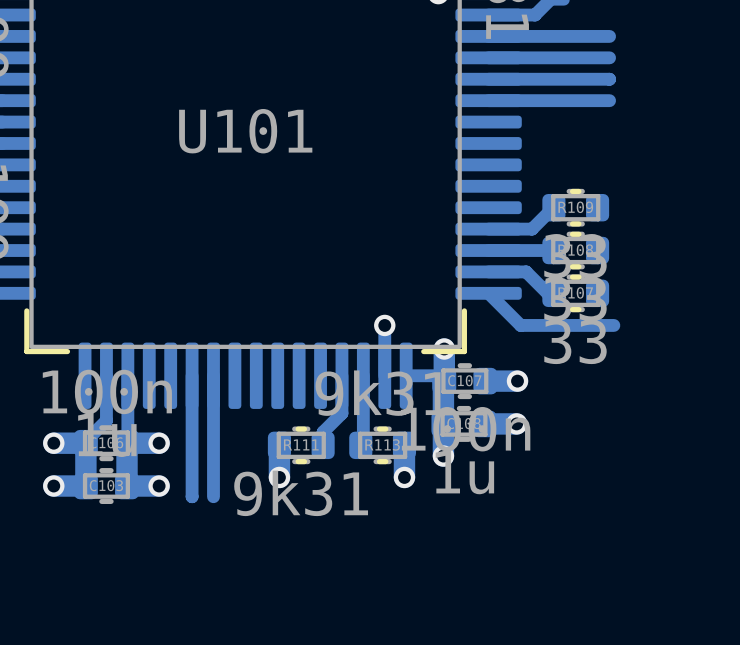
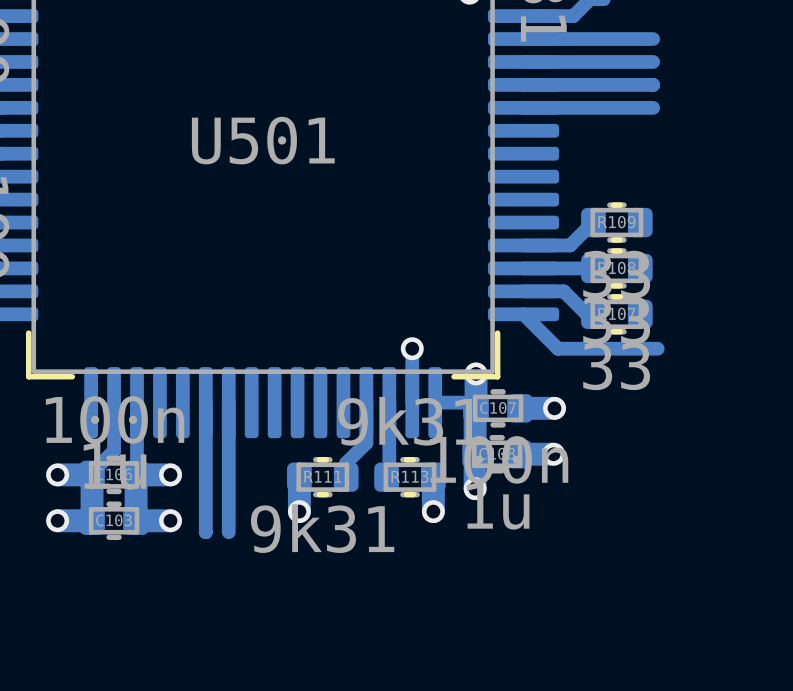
U101 name: U101 (245, 131) -> U501 (263, 140)

